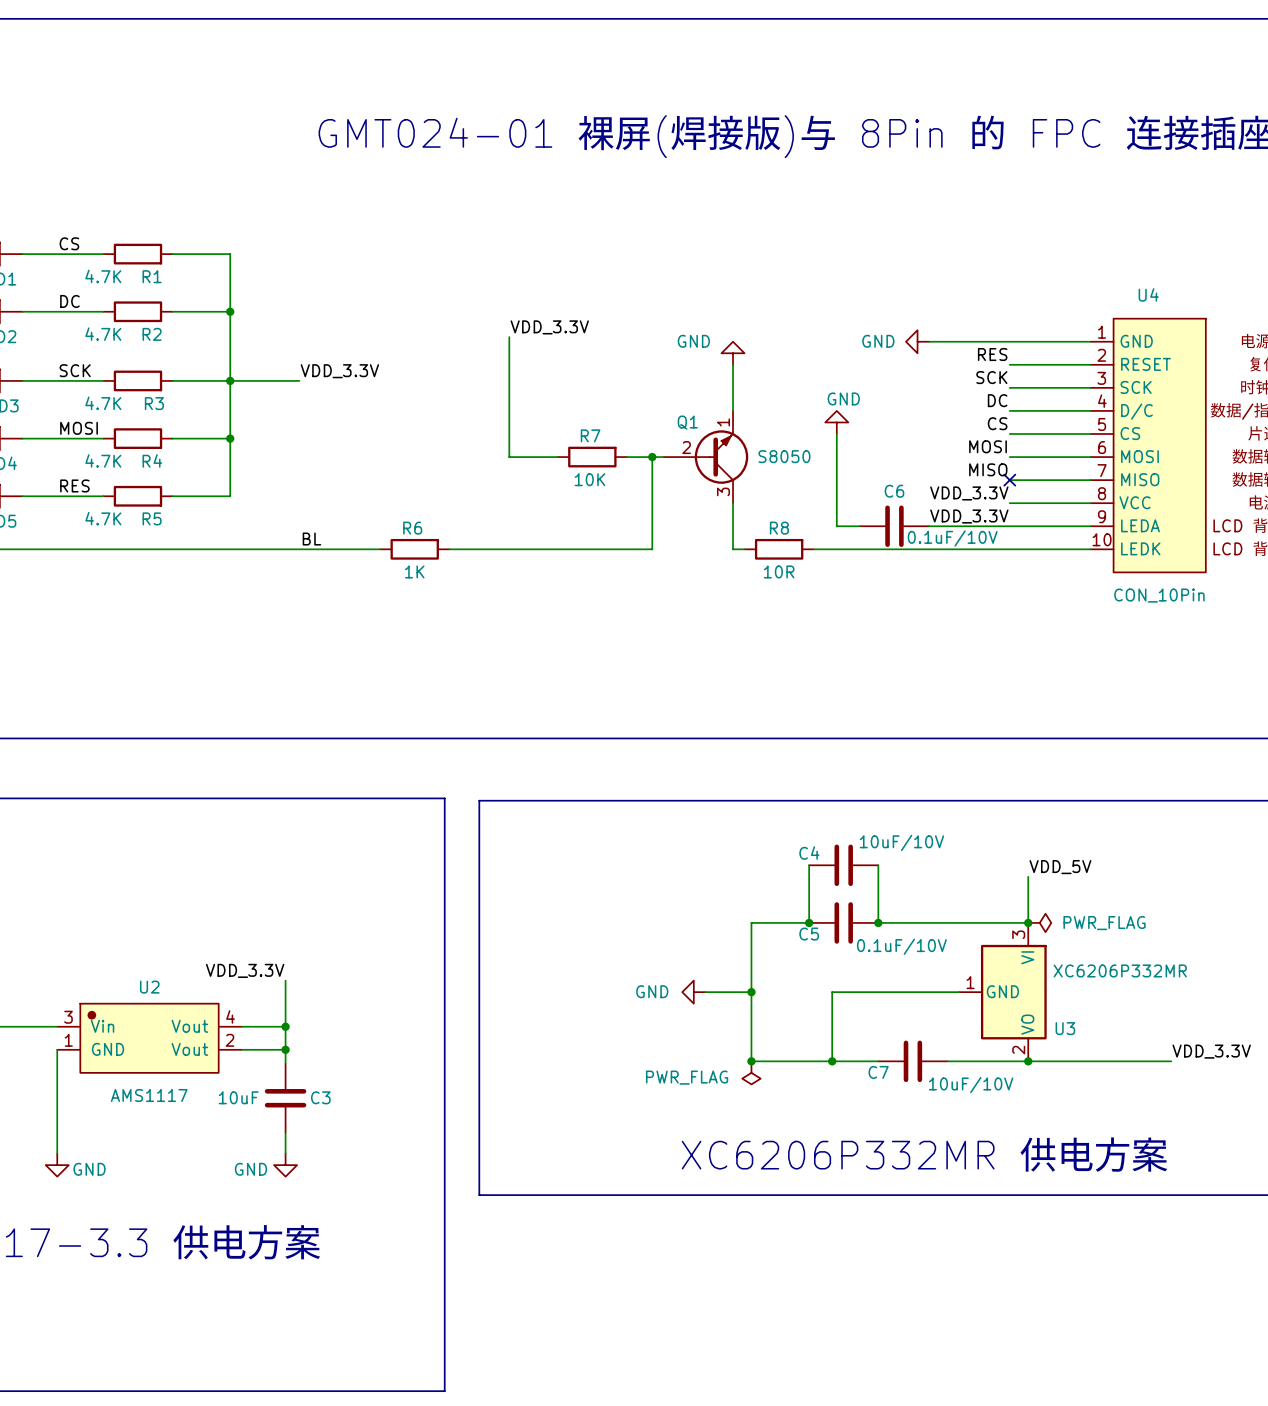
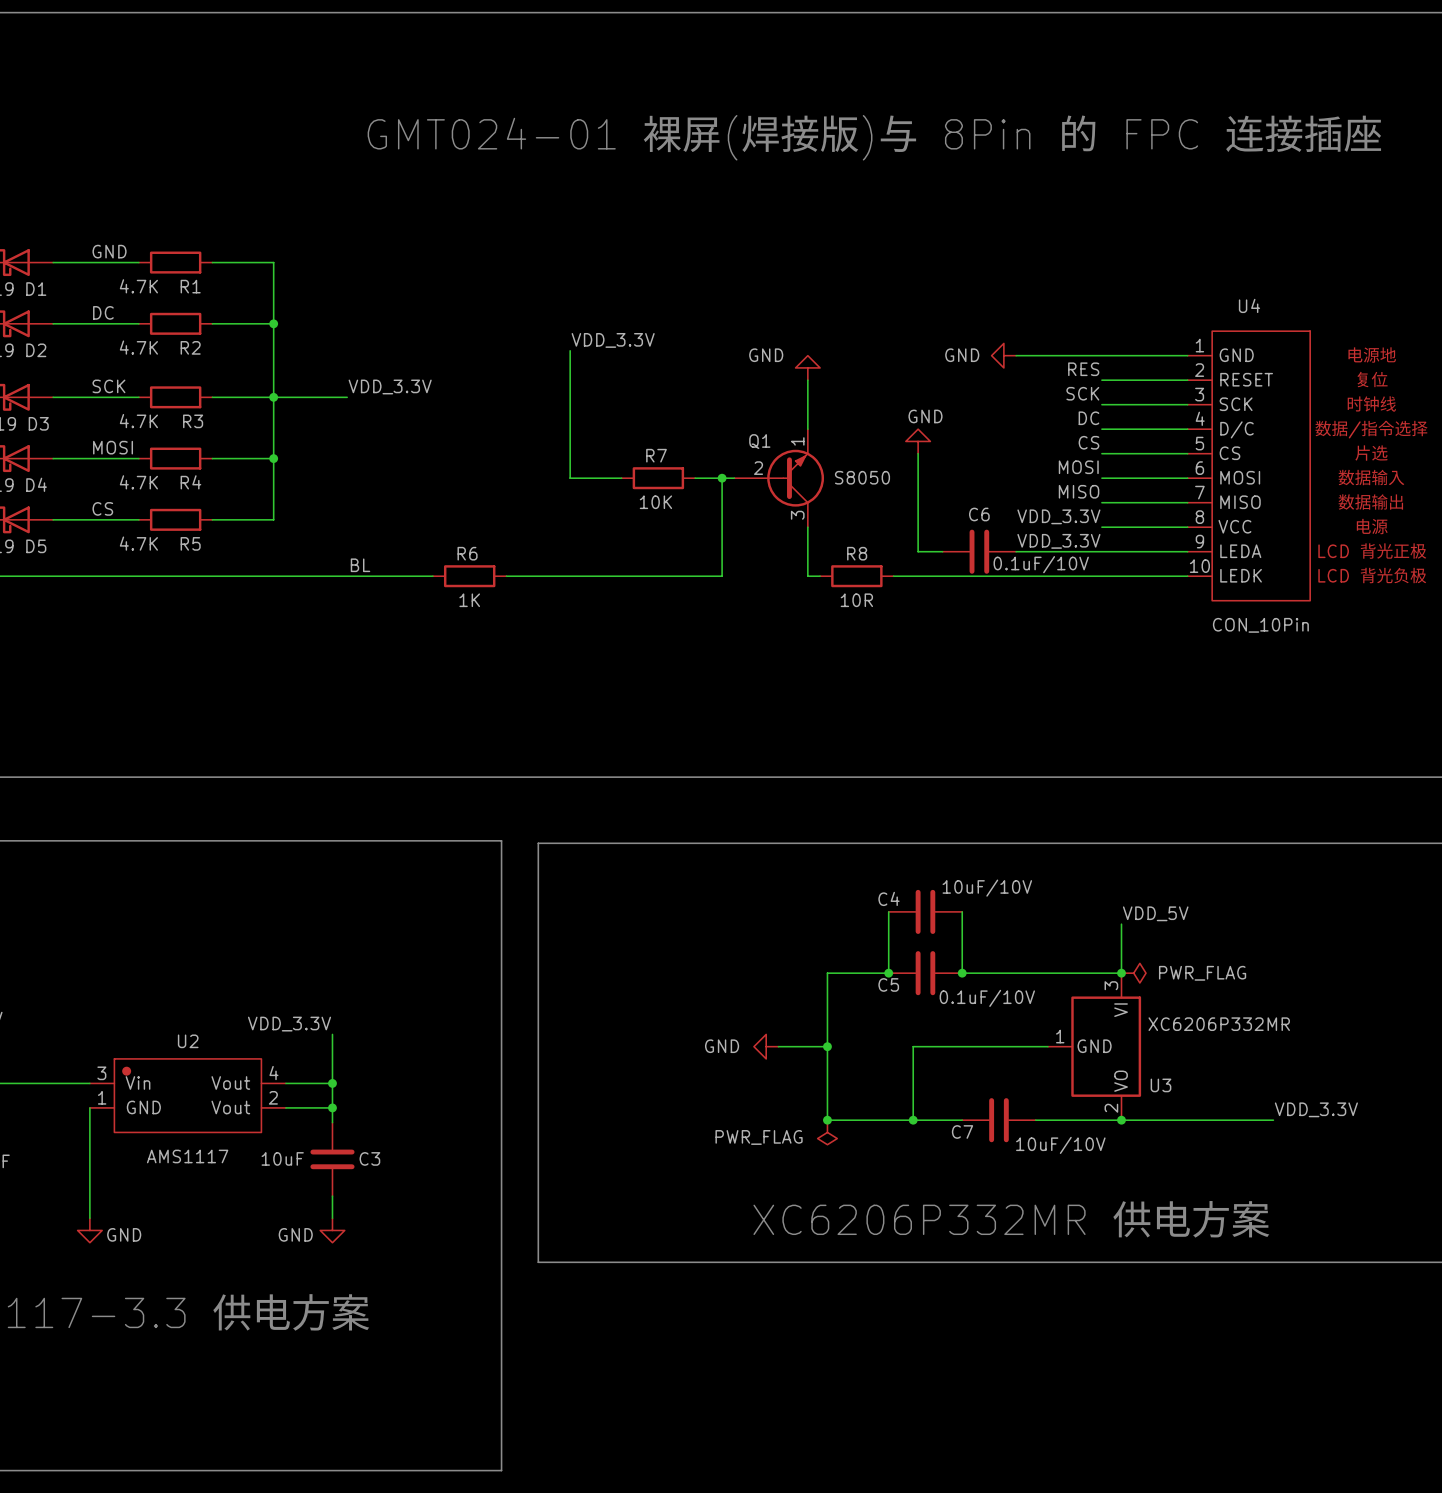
label: CS (69, 243) -> GND (109, 251)
no-connect mark: (1009, 480) -> none
label: RES (74, 485) -> CS (102, 508)

